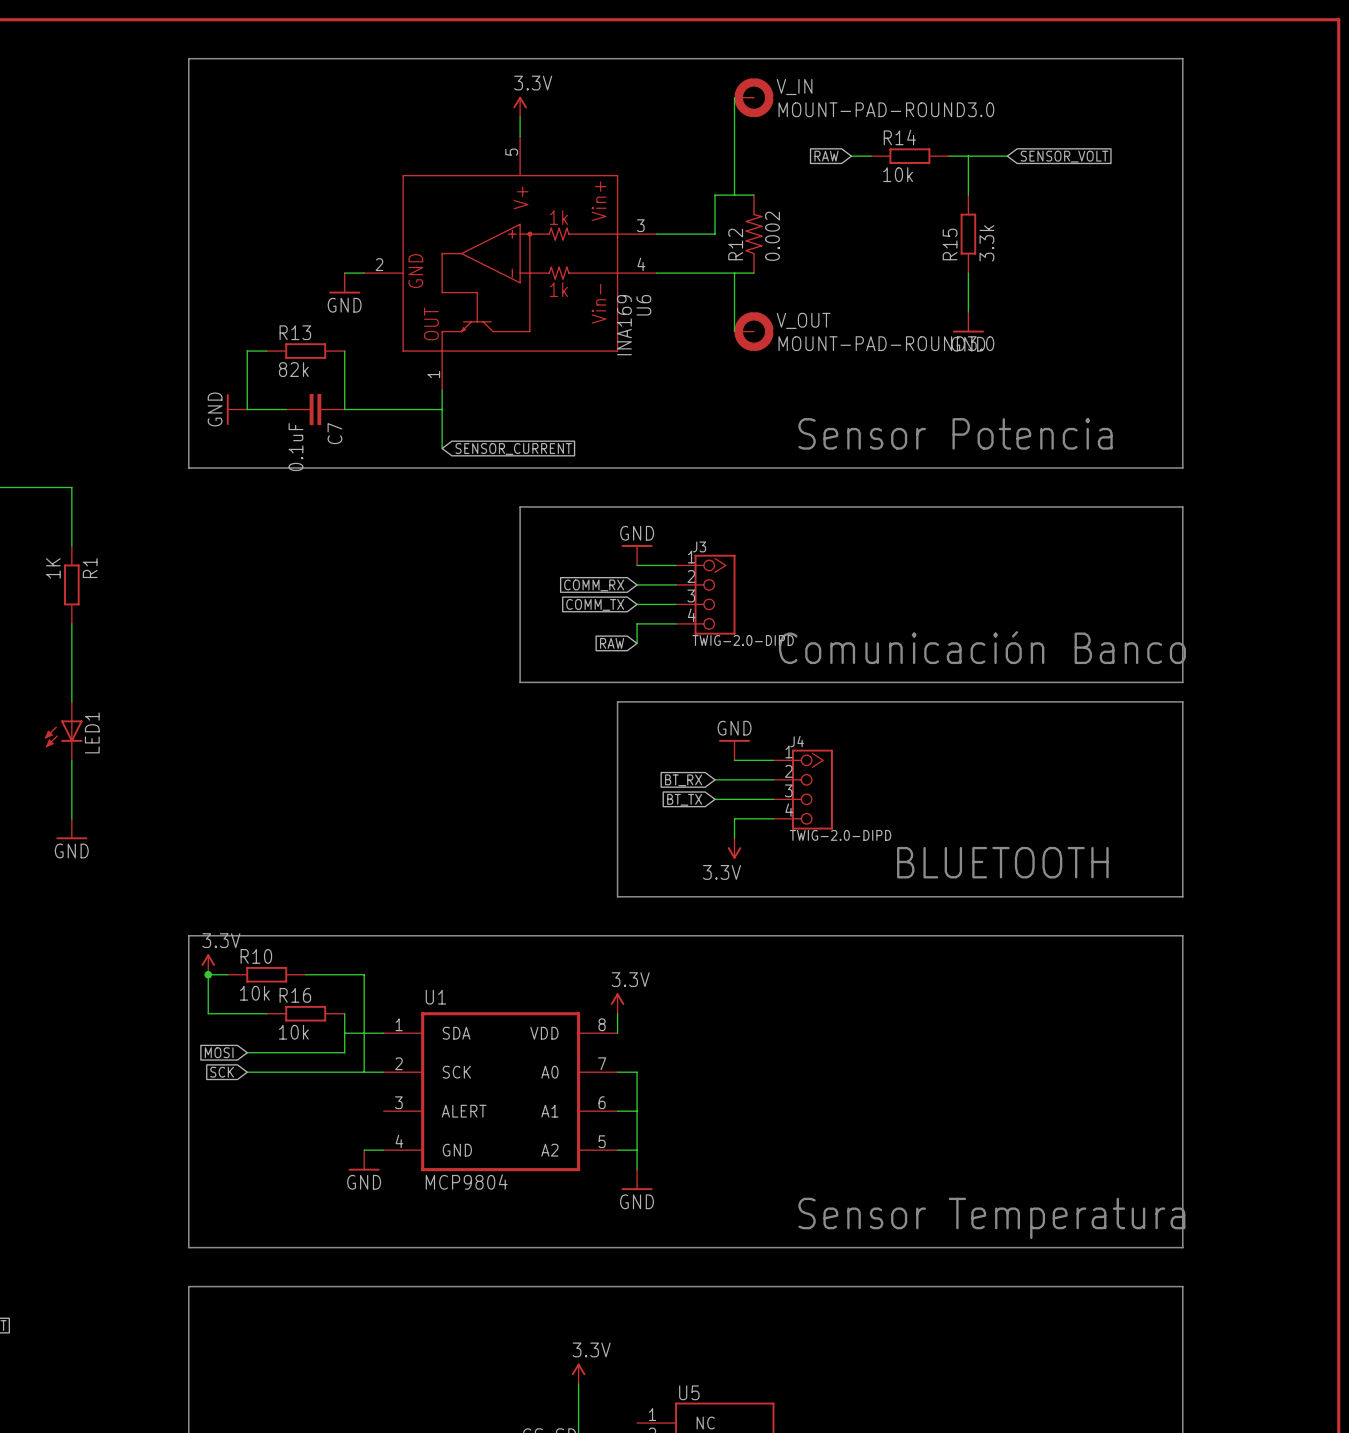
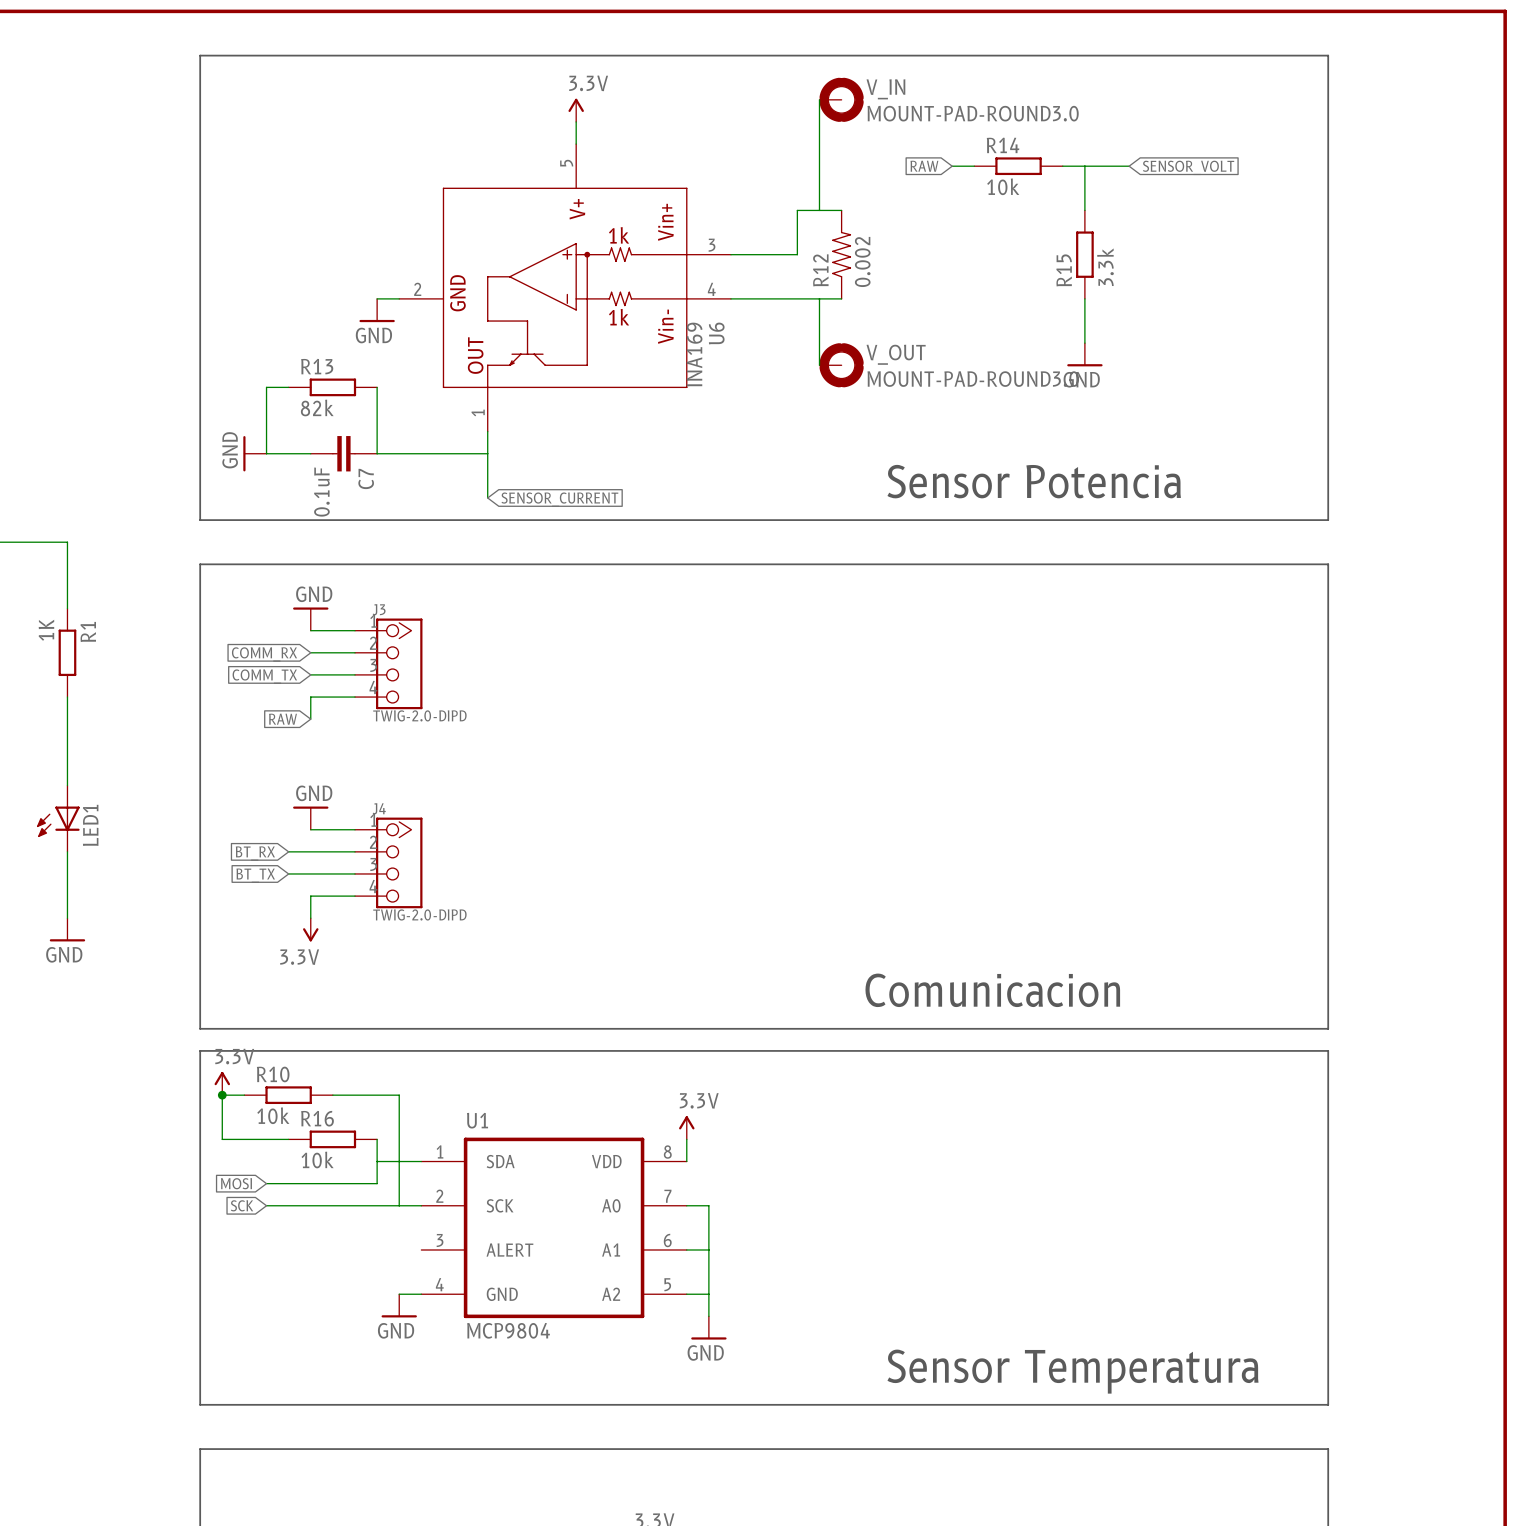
line: (520, 506) (520, 682) (1182, 682) -> (576, 564) (200, 564) (200, 1028) (1328, 1028) (1328, 1006)
power symbol: none -> GND (310, 619)
power symbol: GND (637, 555) -> none
wire: none -> (310, 630) (355, 630)
wire: (637, 565) (676, 565) -> none
wire: none -> (310, 652) (355, 652)
wire: (637, 584) (676, 584) -> none
global label: none -> COMM_RX (264, 654)
global label: COMM_RX (594, 585) -> none
J3 position: (705, 594) -> (388, 663)
global label: none -> COMM_TX (264, 676)
wire: none -> (310, 674) (355, 674)
global label: COMM_TX (595, 604) -> none
wire: (637, 604) (676, 604) -> none
wire: none -> (355, 697) (310, 697) (310, 719)
wire: (676, 623) (637, 623) (637, 643) -> none
global label: none -> RAW (282, 719)
global label: RAW (612, 643) -> none
text: Comunicación Banco (982, 647) -> none
line: (1182, 701) (617, 701) (617, 896) (1182, 896) -> (1328, 785) (1328, 763)
power symbol: none -> GND (310, 818)
wire: none -> (310, 829) (355, 829)
power symbol: GND (734, 750) -> none
global label: none -> BT_RX (255, 853)
wire: none -> (288, 851) (355, 851)
wire: (734, 760) (773, 760) -> none
wire: none -> (288, 873) (355, 873)
wire: (715, 779) (773, 779) -> none
global label: none -> BT_TX (255, 875)
global label: BT_RX (683, 780) -> none
J4 position: (803, 789) -> (388, 862)
wire: none -> (355, 896) (310, 896) (310, 918)
global label: BT_TX (684, 799) -> none
wire: (715, 799) (773, 799) -> none
wire: (773, 818) (734, 818) (734, 838) -> none
power symbol: none -> 3.3V (310, 929)
power symbol: 3.3V (734, 848) -> none
text: BLUETOOTH (1002, 862) -> none
text: none -> Comunicacion (992, 990)

